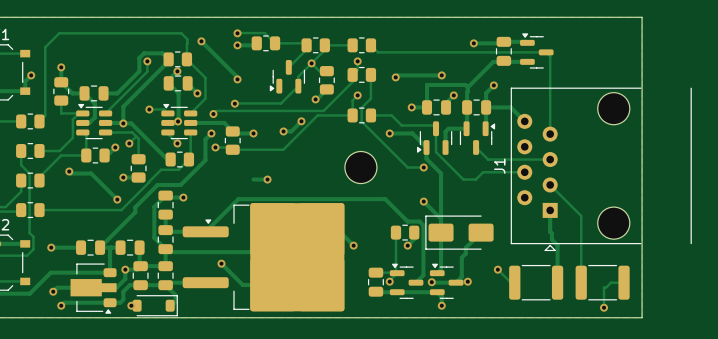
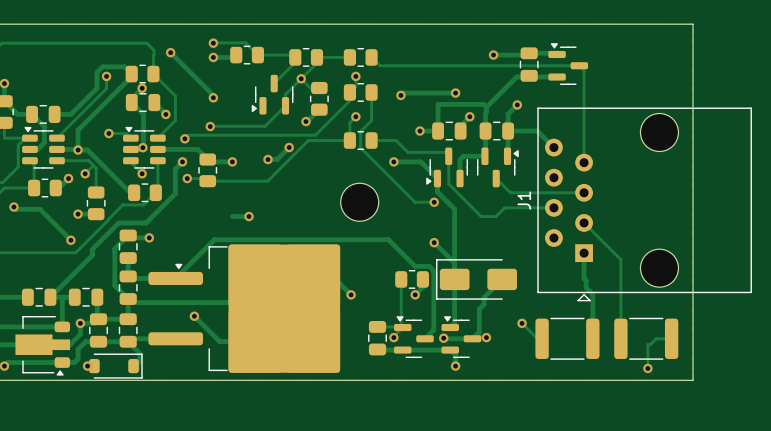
J1 footprint: [510, 87, 692, 252] -> [537, 107, 752, 302]

